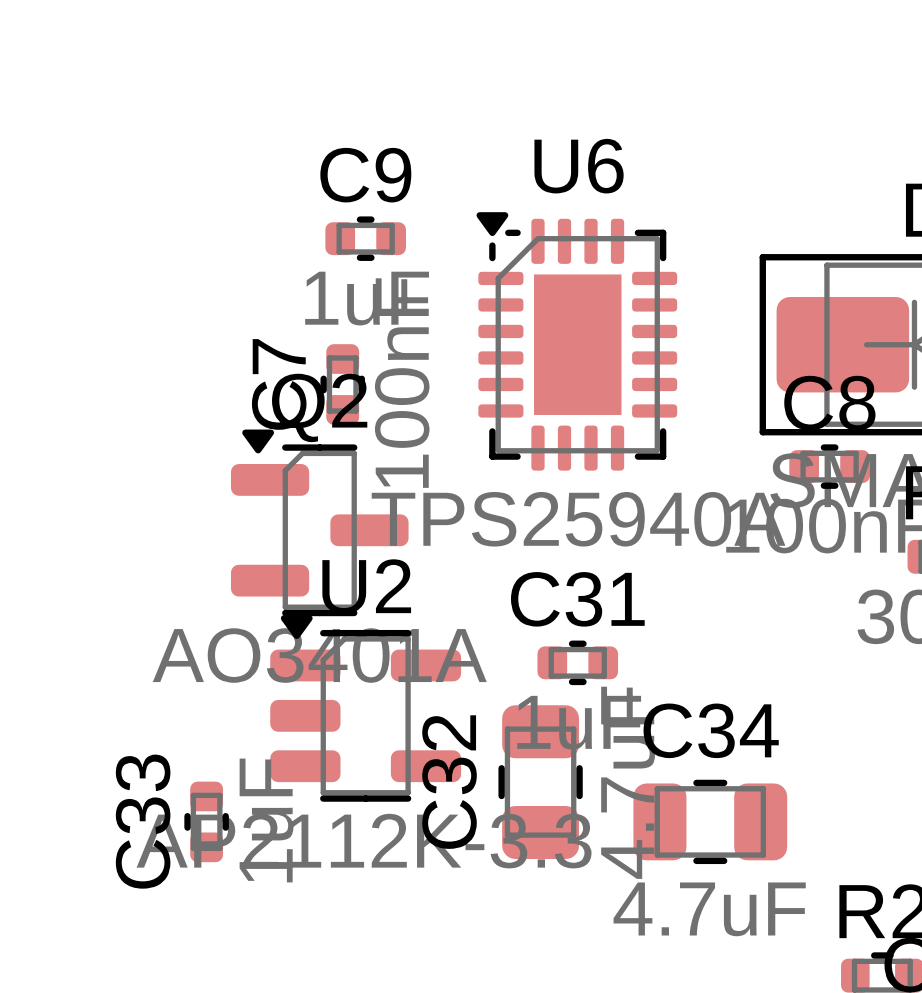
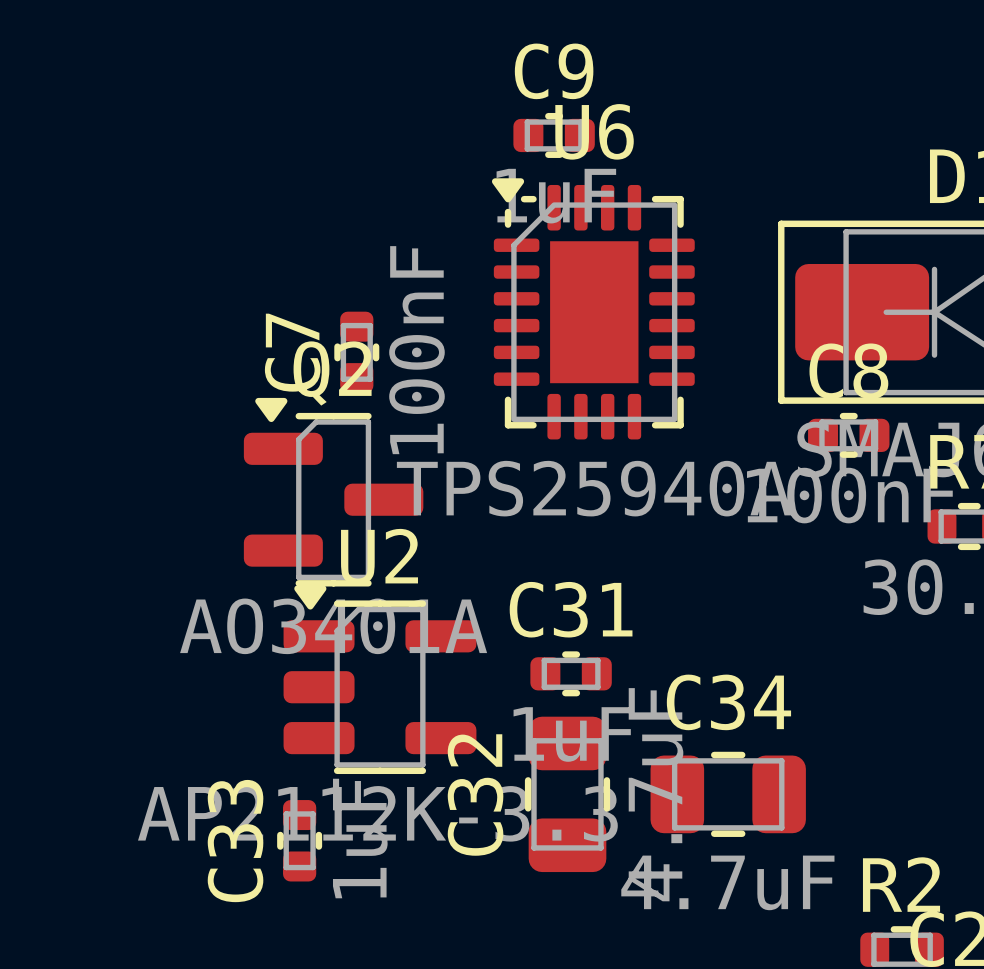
C9 position: (365, 238) -> (554, 135)
C31 position: (577, 662) -> (571, 673)
C32 position: (540, 782) -> (567, 794)
C33 position: (206, 821) -> (299, 840)

